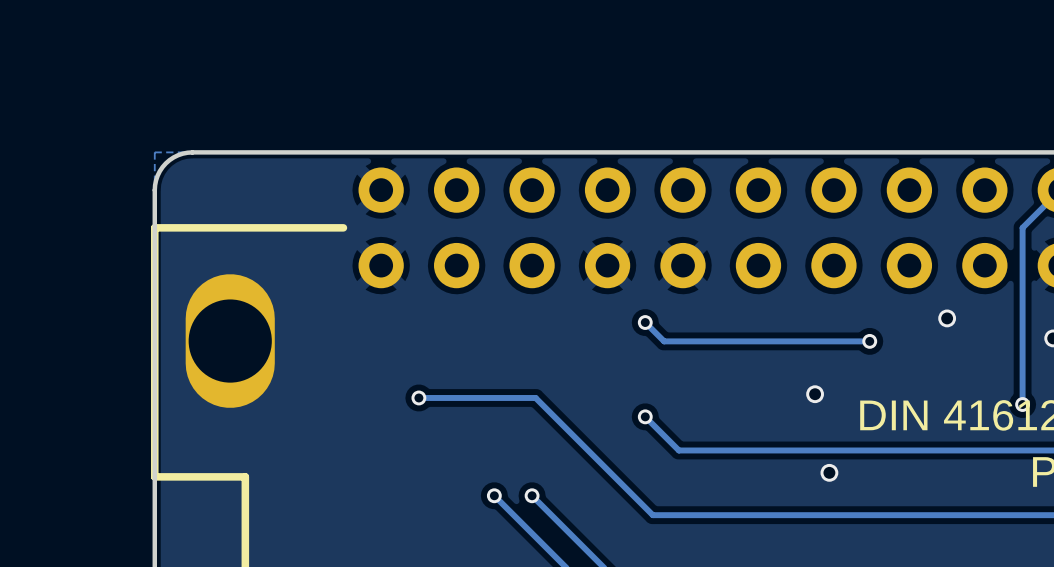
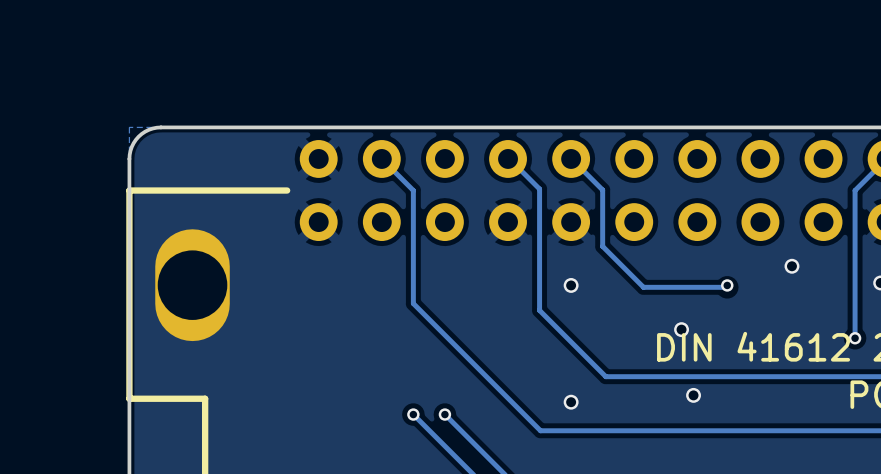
track: none -> (571, 158) (602, 190) (602, 246) (643, 287) (727, 287)
track: (645, 322) (664, 341) (869, 341) -> none
via: (645, 322) -> none
via: none -> (571, 285)
track: (418, 397) (535, 397) (652, 515) -> (381, 158) (413, 190) (413, 303) (540, 430) (545, 430)
via: (418, 397) -> none
track: (645, 416) (678, 450) (724, 450) -> (508, 158) (539, 189) (539, 310) (605, 376)
via: (645, 416) -> none
via: none -> (571, 402)

